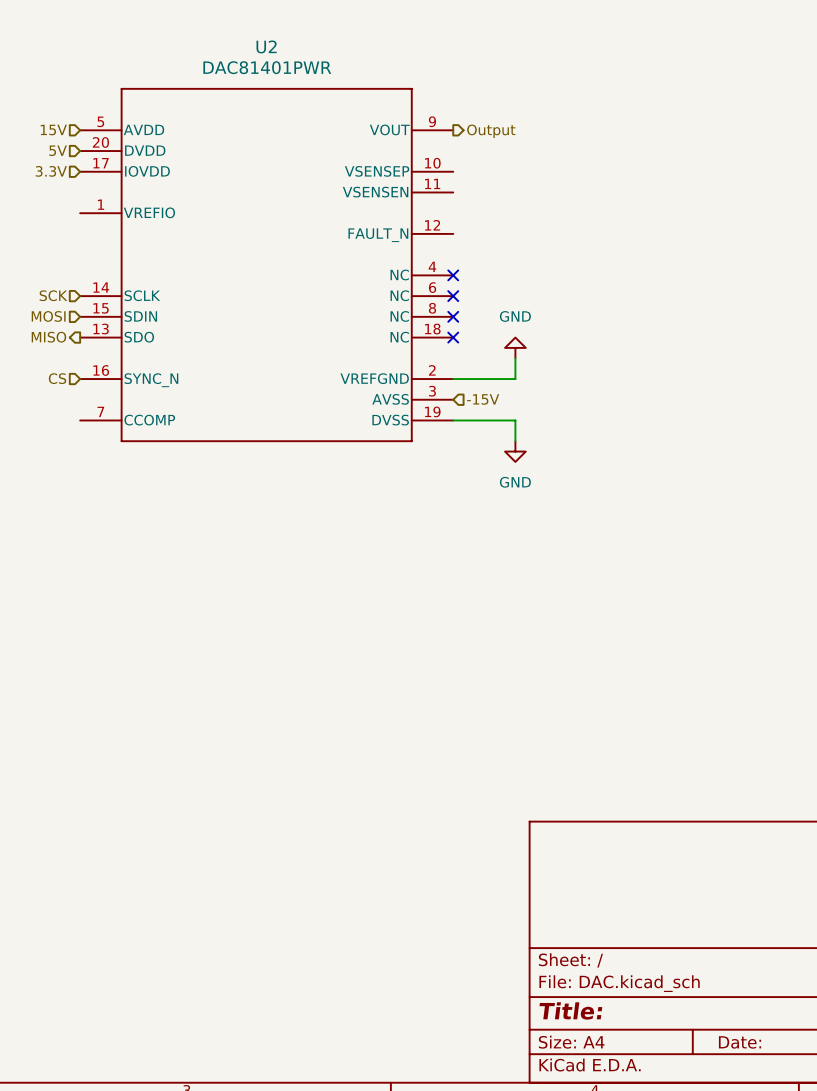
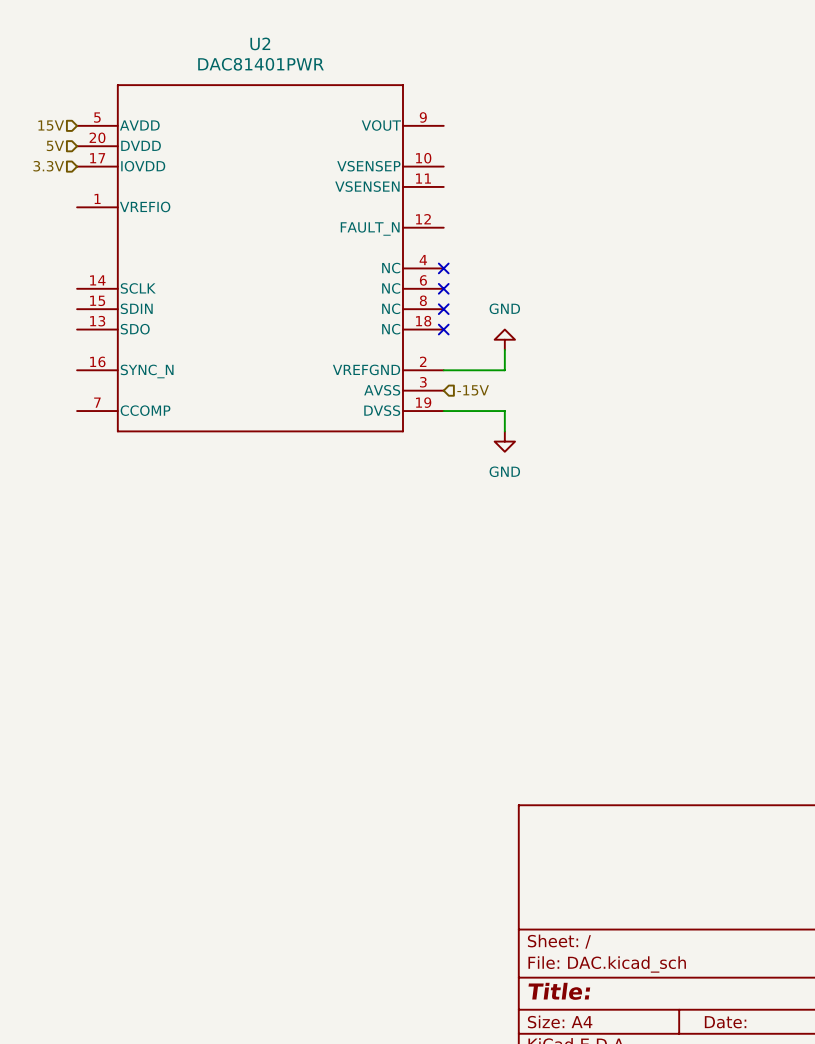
hierarchical label: Output (491, 131) -> none
hierarchical label: SCK (53, 295) -> none
hierarchical label: MOSI (48, 316) -> none
hierarchical label: MISO (48, 337) -> none
hierarchical label: CS (57, 378) -> none

